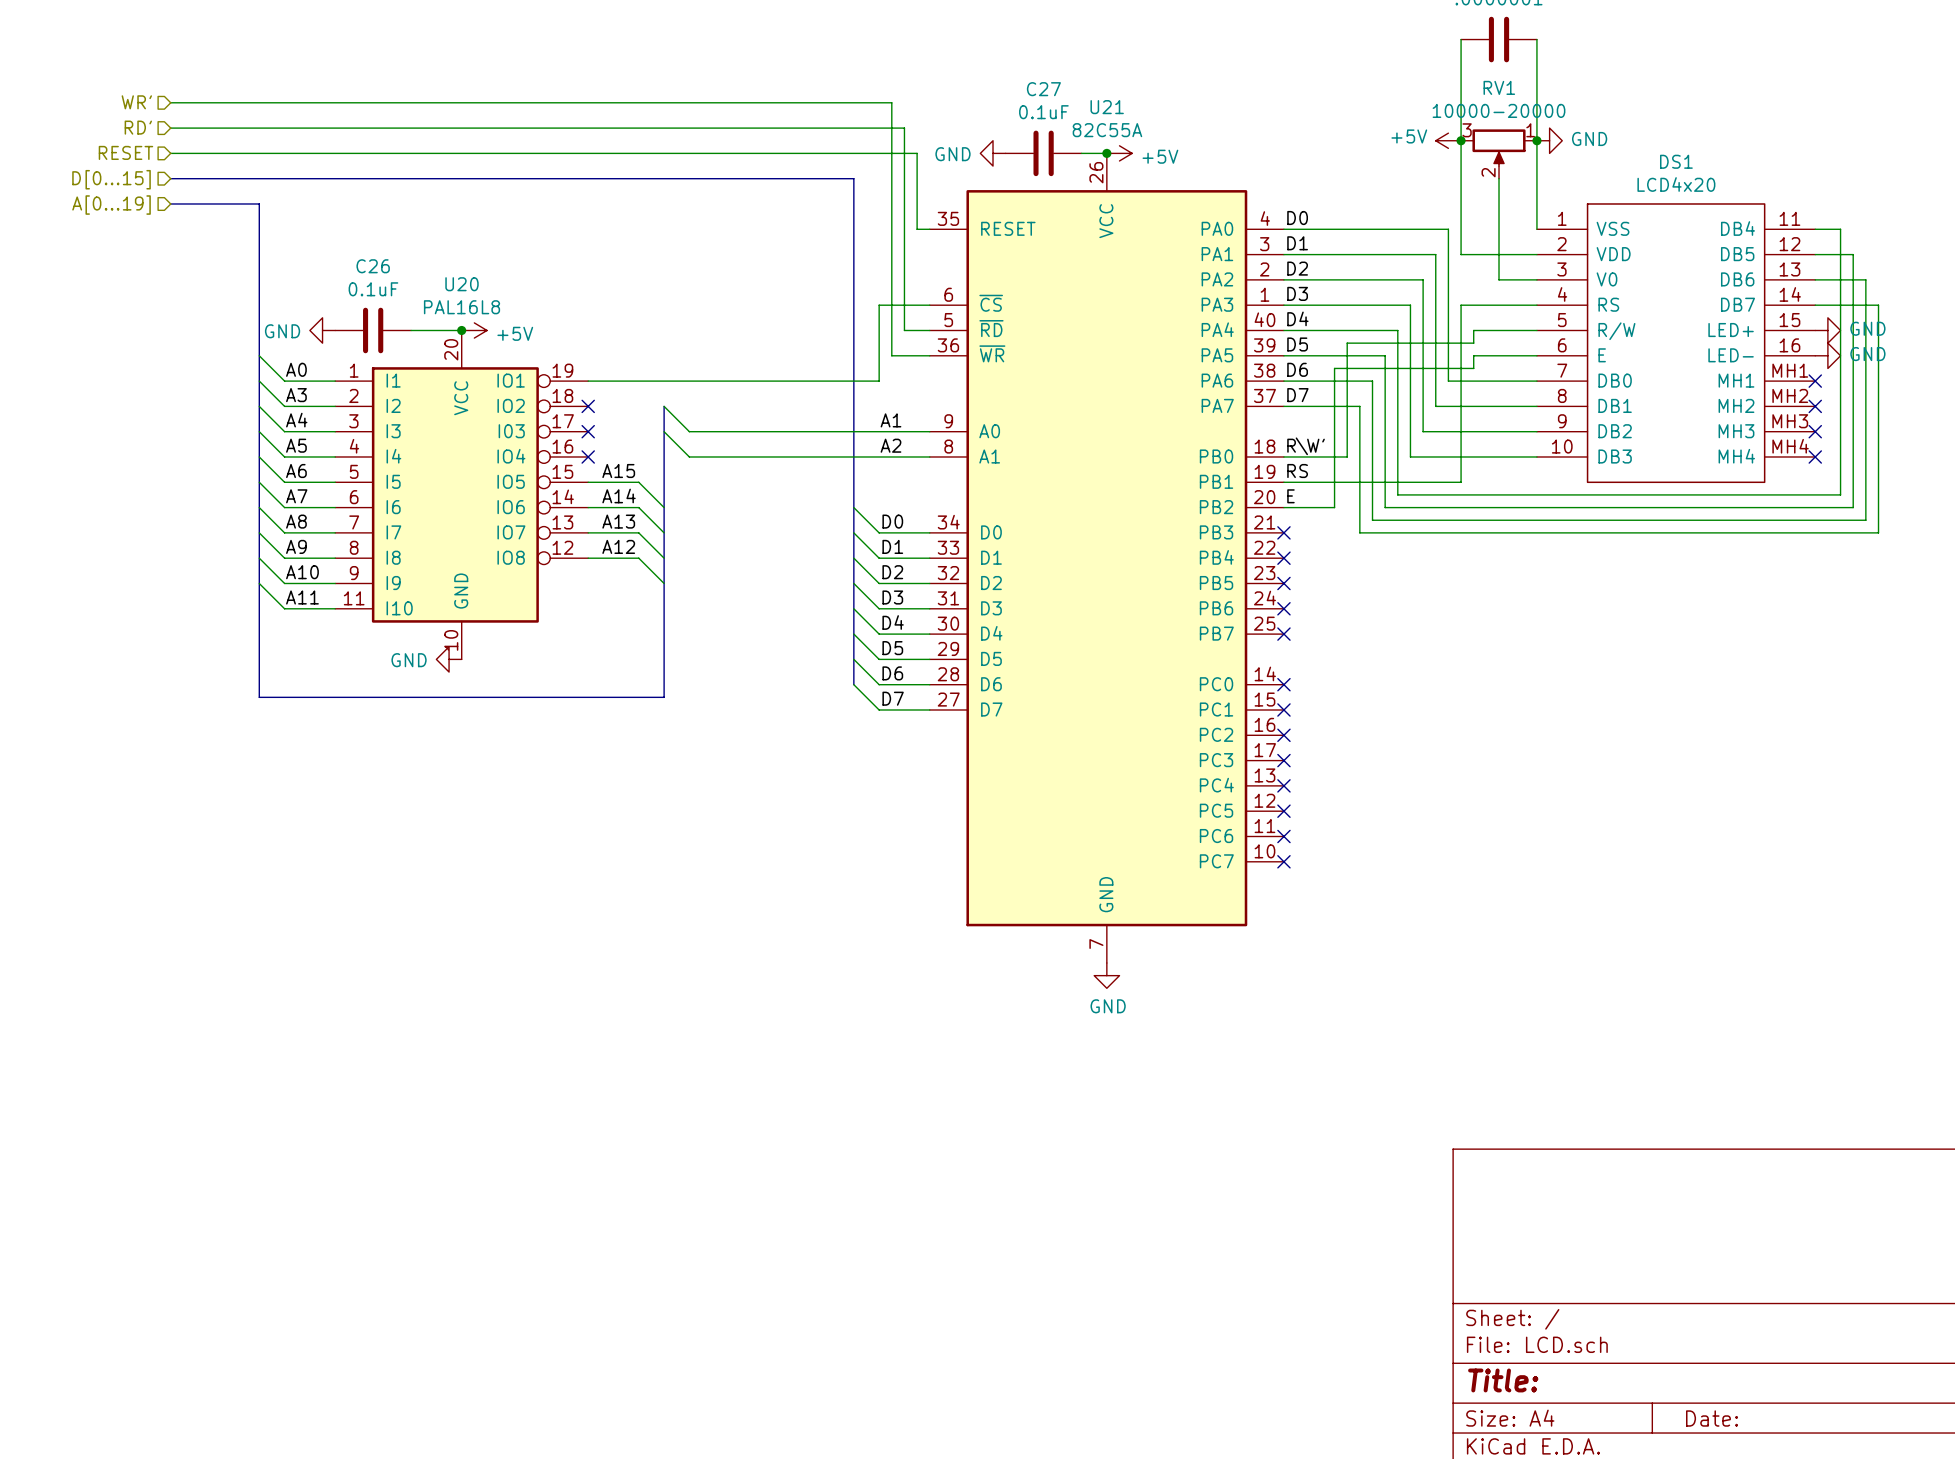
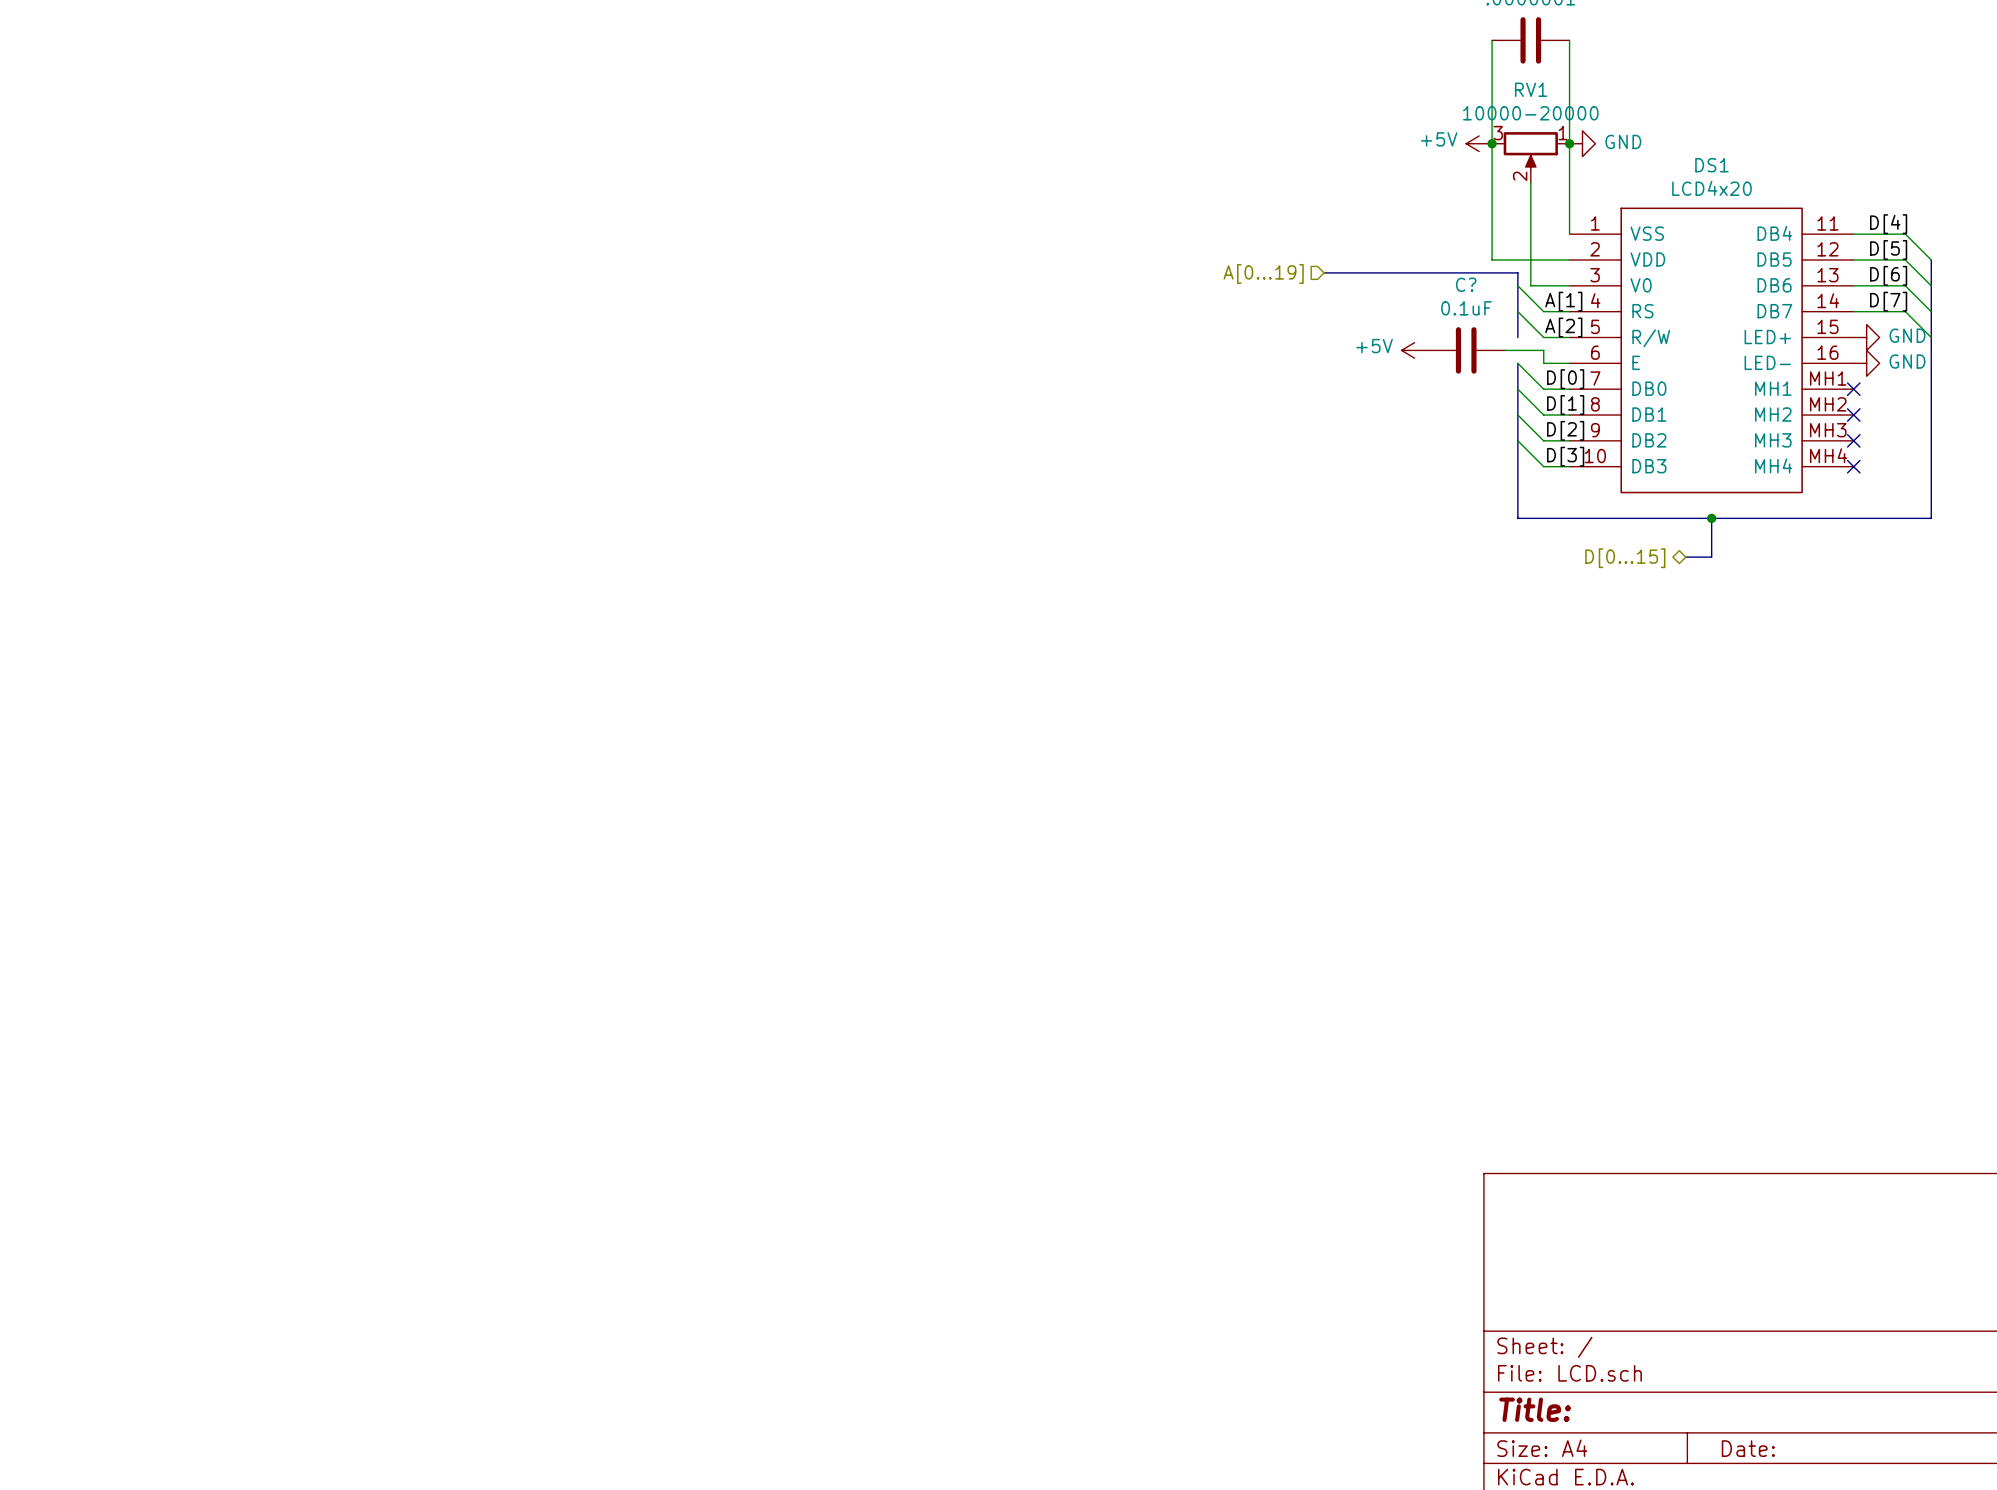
hierarchical label: WR' (136, 102) -> none
wire: (170, 102) (891, 102) (891, 355) (929, 355) -> none
hierarchical label: RD' (138, 127) -> none
wire: (170, 128) (904, 128) (904, 330) (929, 330) -> none
hierarchical label: RESET (125, 152) -> none
wire: (170, 153) (917, 153) (917, 229) (929, 229) -> none
power symbol: GND (993, 153) -> none
C27: 0.1uF (1043, 153) -> none
wire: (1081, 153) (1106, 153) -> none
junction: (1106, 153) -> none
power symbol: +5V (1119, 153) -> none
bus: (170, 178) (853, 178) (853, 684) -> none
hierarchical label: D[0...15] (111, 179) -> none
bus: (170, 203) (259, 203) (259, 697) (664, 697) (664, 406) -> none
hierarchical label: A[0...19] (111, 205) -> none
label: D0 (1297, 218) -> none
label: none -> D[4] (1888, 224)
wire: (1283, 229) (1448, 229) (1448, 381) (1511, 381) -> (1517, 363) (1543, 389)
wire: (1840, 229) (1840, 494) (1397, 494) (1397, 330) (1283, 330) -> (1879, 234) (1905, 234) (1931, 259)
label: D1 (1297, 243) -> none
label: none -> D[5] (1888, 250)
wire: (1283, 254) (1435, 254) (1435, 406) (1511, 406) -> (1517, 389) (1543, 415)
wire: (1853, 254) (1853, 507) (1385, 507) (1385, 355) (1283, 355) -> (1892, 259) (1905, 259) (1931, 285)
bus: none -> (1931, 259) (1931, 518) (1517, 518) (1517, 363)
bus: none -> (1324, 272) (1517, 272) (1517, 337)
hierarchical label: none -> A[0...19] (1263, 273)
label: D2 (1297, 268) -> none
label: none -> D[6] (1888, 275)
wire: (1283, 279) (1423, 279) (1423, 431) (1511, 431) -> (1517, 415) (1543, 440)
wire: (1865, 279) (1865, 520) (1372, 520) (1372, 381) (1283, 381) -> (1905, 285) (1931, 311)
label: D3 (1297, 293) -> none
label: none -> A[1] (1563, 301)
label: none -> D[7] (1888, 301)
wire: (929, 305) (879, 305) (879, 381) (588, 381) -> none
wire: (1283, 305) (1410, 305) (1410, 456) (1511, 456) -> (1517, 440) (1543, 466)
wire: (1511, 305) (1461, 305) (1461, 482) (1283, 482) -> (1543, 311) (1517, 285)
wire: (1865, 305) (1878, 305) (1878, 532) (1359, 532) (1359, 406) (1283, 406) -> (1905, 311) (1931, 337)
label: D4 (1297, 318) -> none
label: none -> A[2] (1563, 327)
power symbol: GND (322, 330) -> none
C26: 0.1uF (373, 330) -> none
wire: (411, 330) (461, 330) -> none
junction: (461, 330) -> none
power symbol: +5V (474, 330) -> none
wire: (1511, 330) (1473, 330) (1473, 343) (1347, 343) (1347, 456) (1283, 456) -> (1543, 337) (1517, 311)
power symbol: none -> +5V (1414, 350)
C?: none -> 0.1uF (1466, 350)
label: D5 (1297, 344) -> none
wire: (259, 355) (284, 381) (335, 381) -> none
wire: (1511, 355) (1473, 355) (1473, 368) (1334, 368) (1334, 507) (1283, 507) -> (1543, 363) (1543, 350) (1504, 350)
label: A0 (296, 369) -> none
label: D6 (1297, 369) -> none
label: none -> D[0] (1565, 379)
wire: (259, 381) (284, 406) (335, 406) -> none
label: A3 (296, 395) -> none
label: D7 (1297, 395) -> none
label: none -> D[1] (1565, 405)
wire: (259, 406) (284, 431) (335, 431) -> none
no-connect mark: (588, 406) -> none
wire: (664, 406) (689, 431) (929, 431) -> none
label: A4 (296, 420) -> none
label: A1 (890, 420) -> none
label: none -> D[2] (1565, 430)
wire: (259, 431) (284, 456) (335, 456) -> none
no-connect mark: (588, 431) -> none
wire: (664, 431) (689, 456) (929, 456) -> none
label: A5 (296, 445) -> none
label: A2 (890, 445) -> none
label: R\W' (1306, 446) -> none
label: none -> D[3] (1565, 456)
wire: (259, 456) (284, 482) (335, 482) -> none
no-connect mark: (588, 456) -> none
label: A6 (296, 471) -> none
label: A15 (618, 471) -> none
label: RS (1297, 471) -> none
wire: (259, 482) (284, 507) (335, 507) -> none
wire: (588, 482) (638, 482) (664, 507) -> none
U20: PAL16L8 (461, 494) -> none
label: A7 (296, 496) -> none
label: A14 (619, 496) -> none
label: E (1290, 496) -> none
wire: (259, 507) (284, 532) (335, 532) -> none
wire: (588, 507) (638, 507) (664, 532) -> none
wire: (853, 507) (879, 532) (929, 532) -> none
bus: none -> (1711, 518) (1711, 557) (1685, 557)
junction: none -> (1711, 518)
label: A8 (296, 521) -> none
label: A13 (618, 521) -> none
label: D0 (892, 521) -> none
wire: (259, 532) (284, 558) (335, 558) -> none
wire: (588, 532) (638, 532) (664, 558) -> none
wire: (853, 532) (879, 558) (929, 558) -> none
no-connect mark: (1283, 532) -> none
label: A9 (296, 546) -> none
label: A12 (618, 546) -> none
label: D1 (892, 546) -> none
hierarchical label: none -> D[0...15] (1625, 558)
wire: (259, 558) (284, 583) (335, 583) -> none
wire: (588, 558) (638, 558) (664, 583) -> none
wire: (853, 558) (879, 583) (929, 583) -> none
U21: 82C55A (1106, 558) -> none
no-connect mark: (1283, 558) -> none
label: A10 (302, 572) -> none
label: D2 (892, 572) -> none
wire: (259, 583) (284, 608) (335, 608) -> none
wire: (853, 583) (879, 608) (929, 608) -> none
no-connect mark: (1283, 583) -> none
label: A11 (302, 597) -> none
label: D3 (892, 597) -> none
wire: (853, 608) (879, 634) (929, 634) -> none
no-connect mark: (1283, 608) -> none
label: D4 (893, 622) -> none
wire: (853, 634) (879, 659) (929, 659) -> none
no-connect mark: (1283, 634) -> none
label: D5 (892, 648) -> none
power symbol: GND (449, 659) -> none
wire: (853, 659) (879, 684) (929, 684) -> none
label: D6 (892, 673) -> none
wire: (853, 684) (879, 709) (929, 709) -> none
no-connect mark: (1283, 684) -> none
label: D7 (893, 698) -> none
no-connect mark: (1283, 709) -> none
no-connect mark: (1283, 735) -> none
no-connect mark: (1283, 760) -> none
no-connect mark: (1283, 785) -> none
no-connect mark: (1283, 811) -> none
no-connect mark: (1283, 836) -> none
no-connect mark: (1283, 861) -> none
power symbol: GND (1106, 975) -> none

